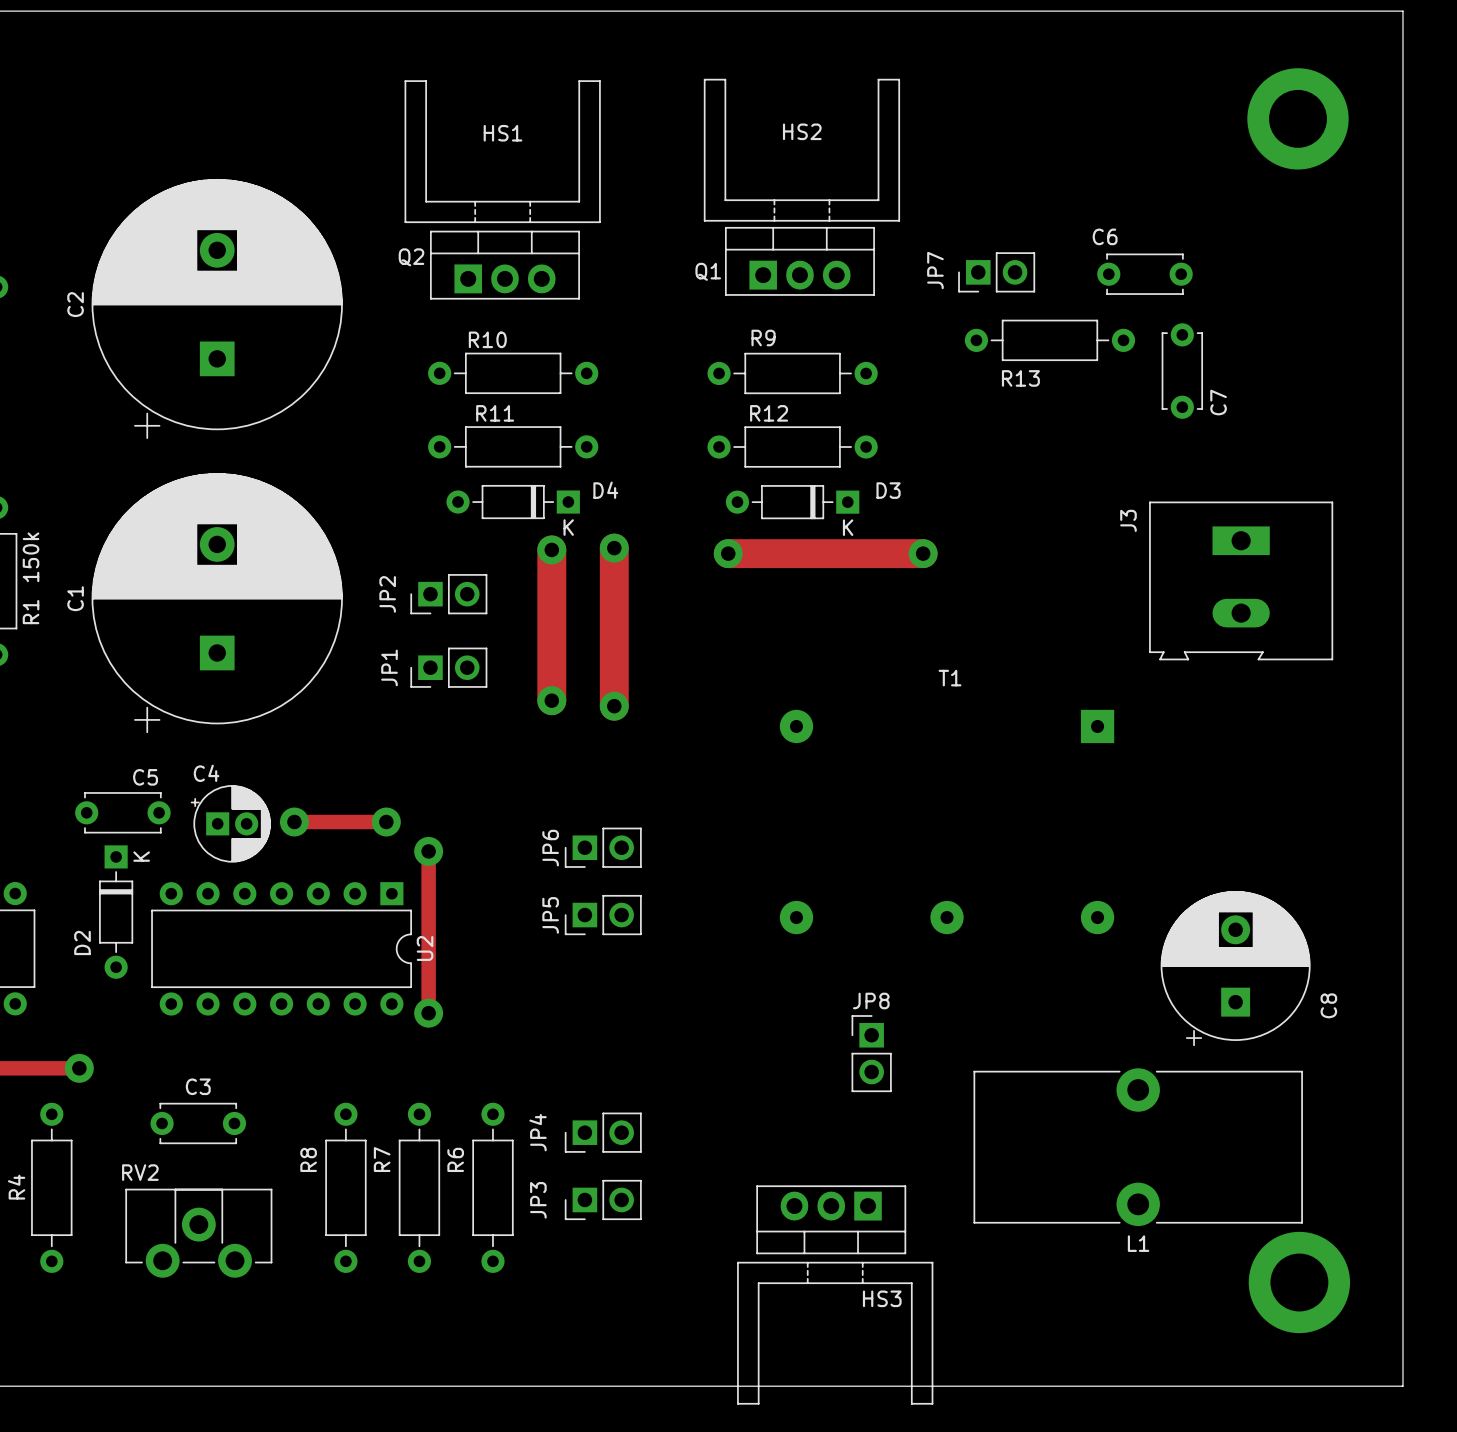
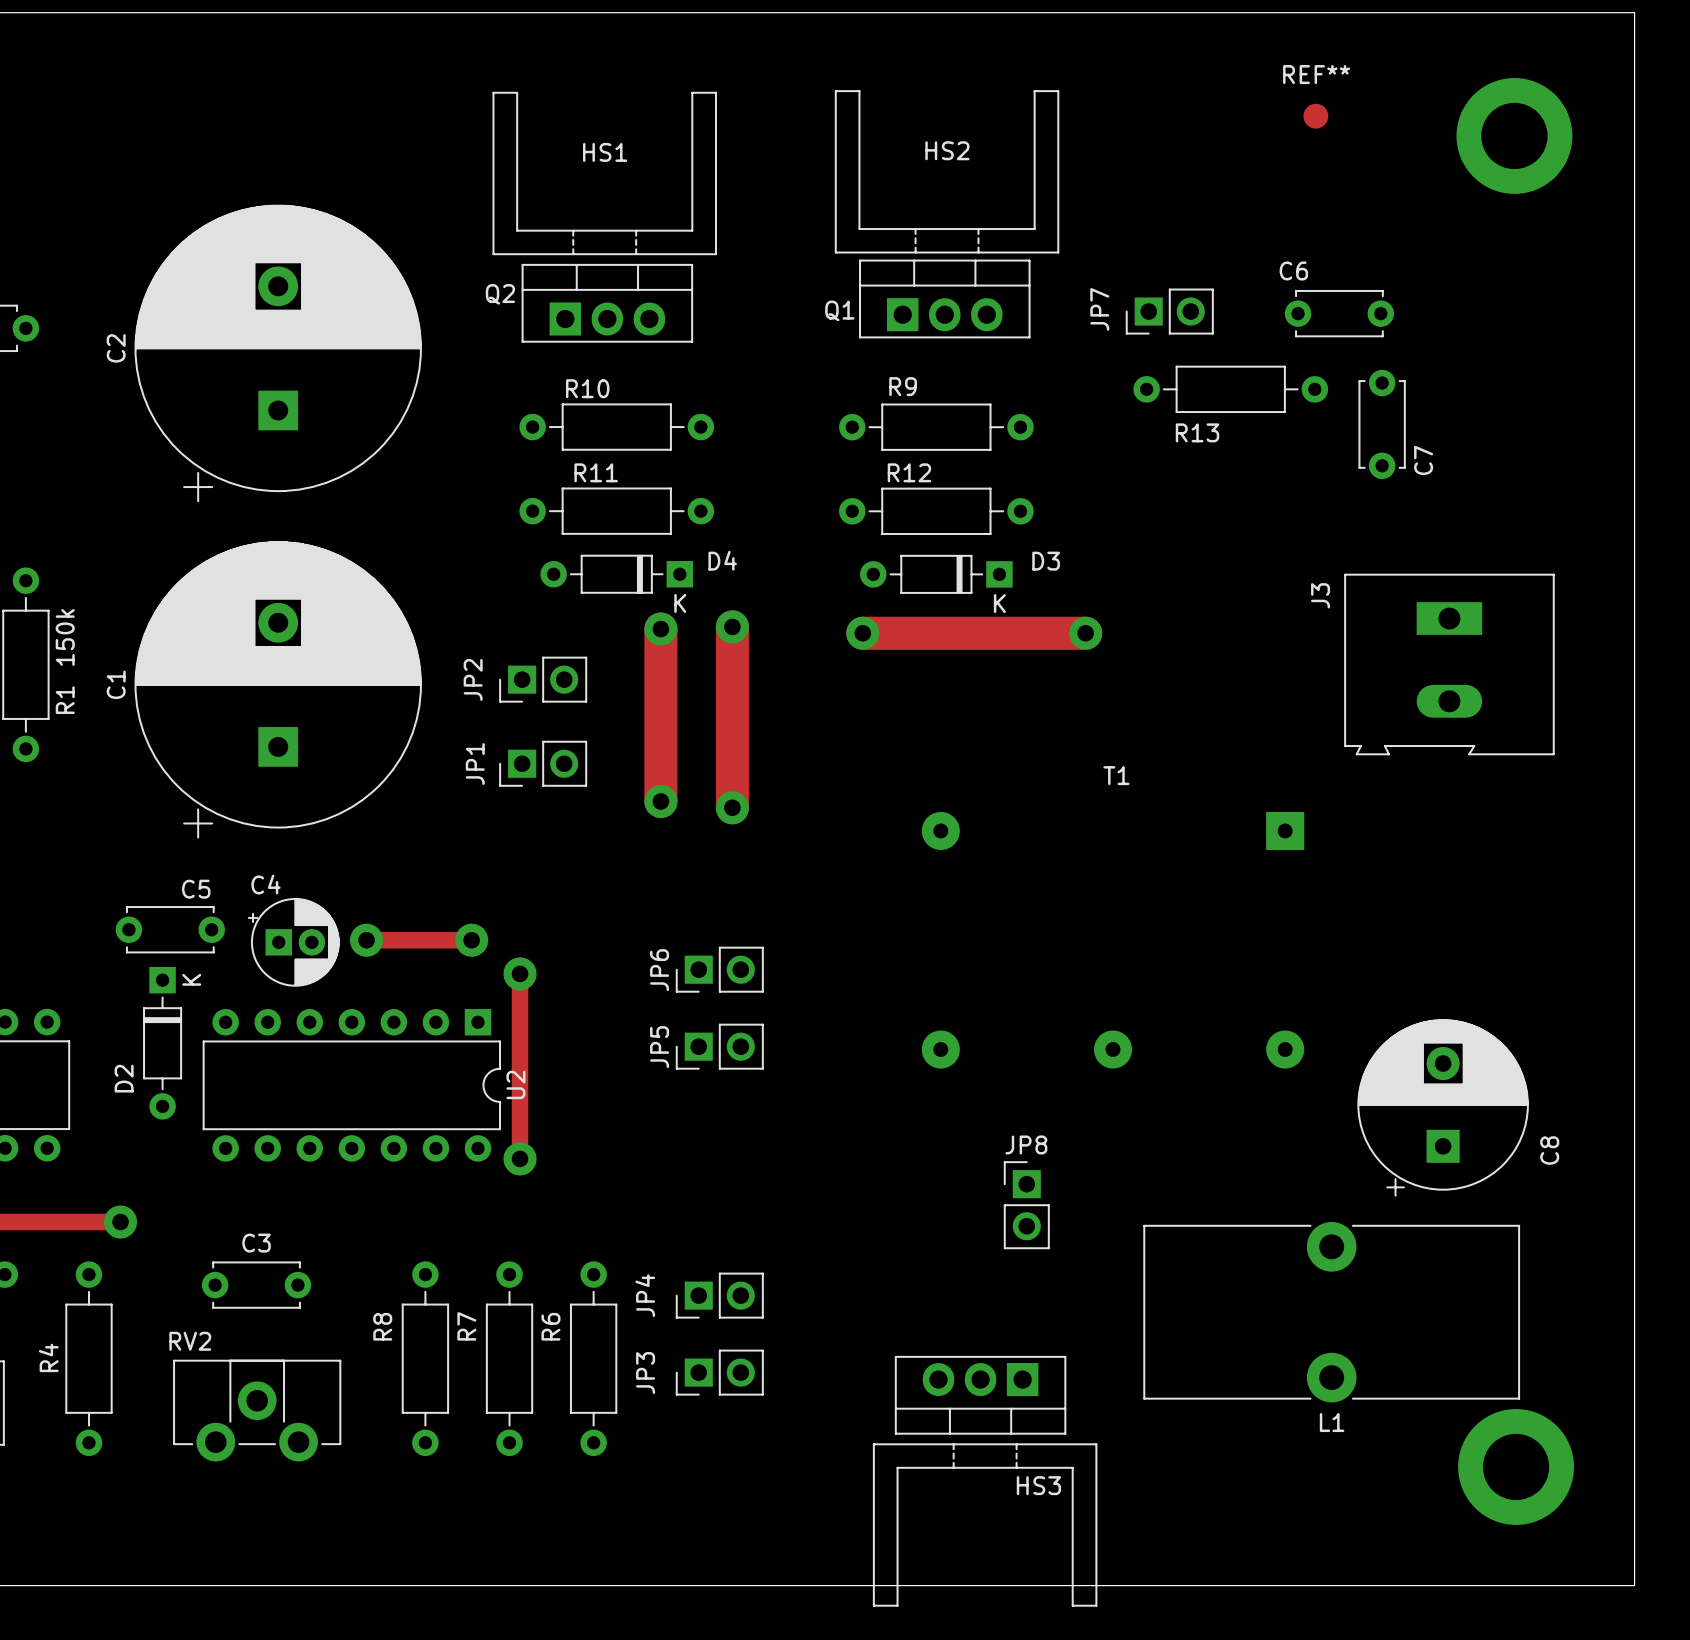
REF**: none -> (1315, 116)

